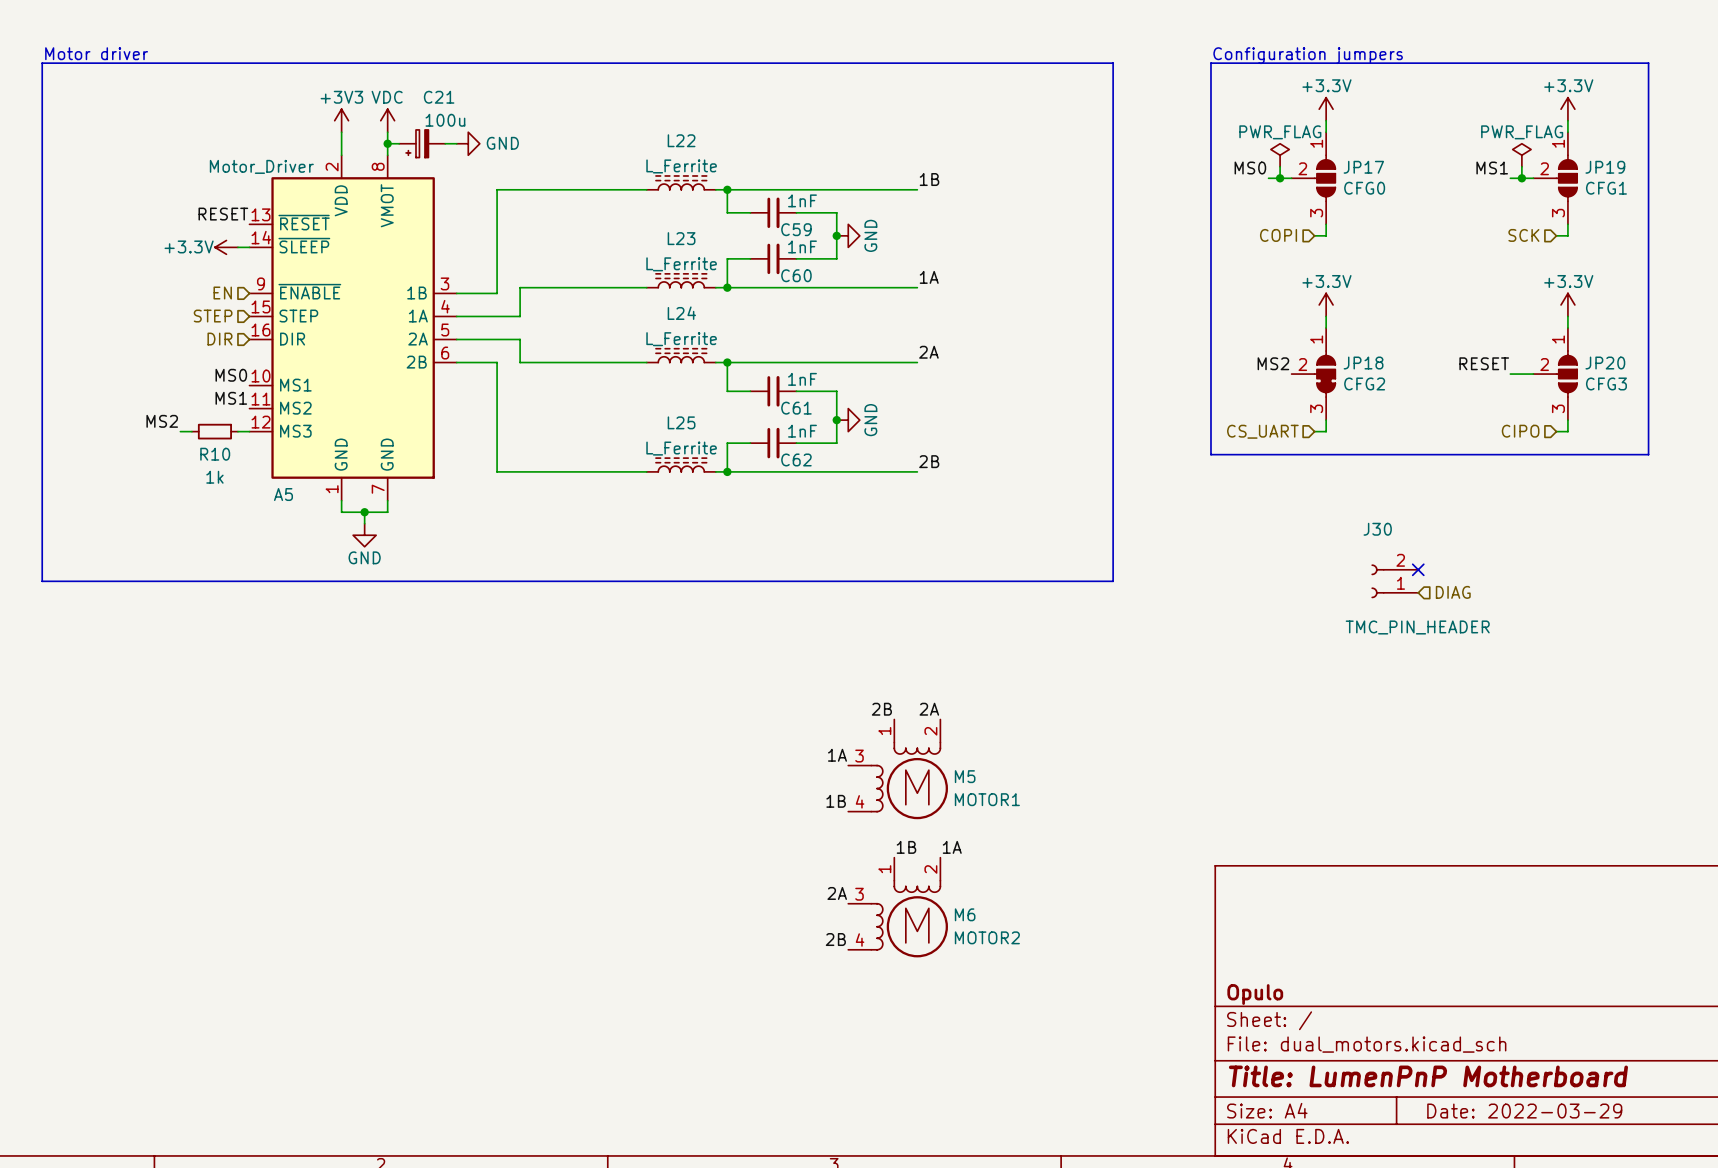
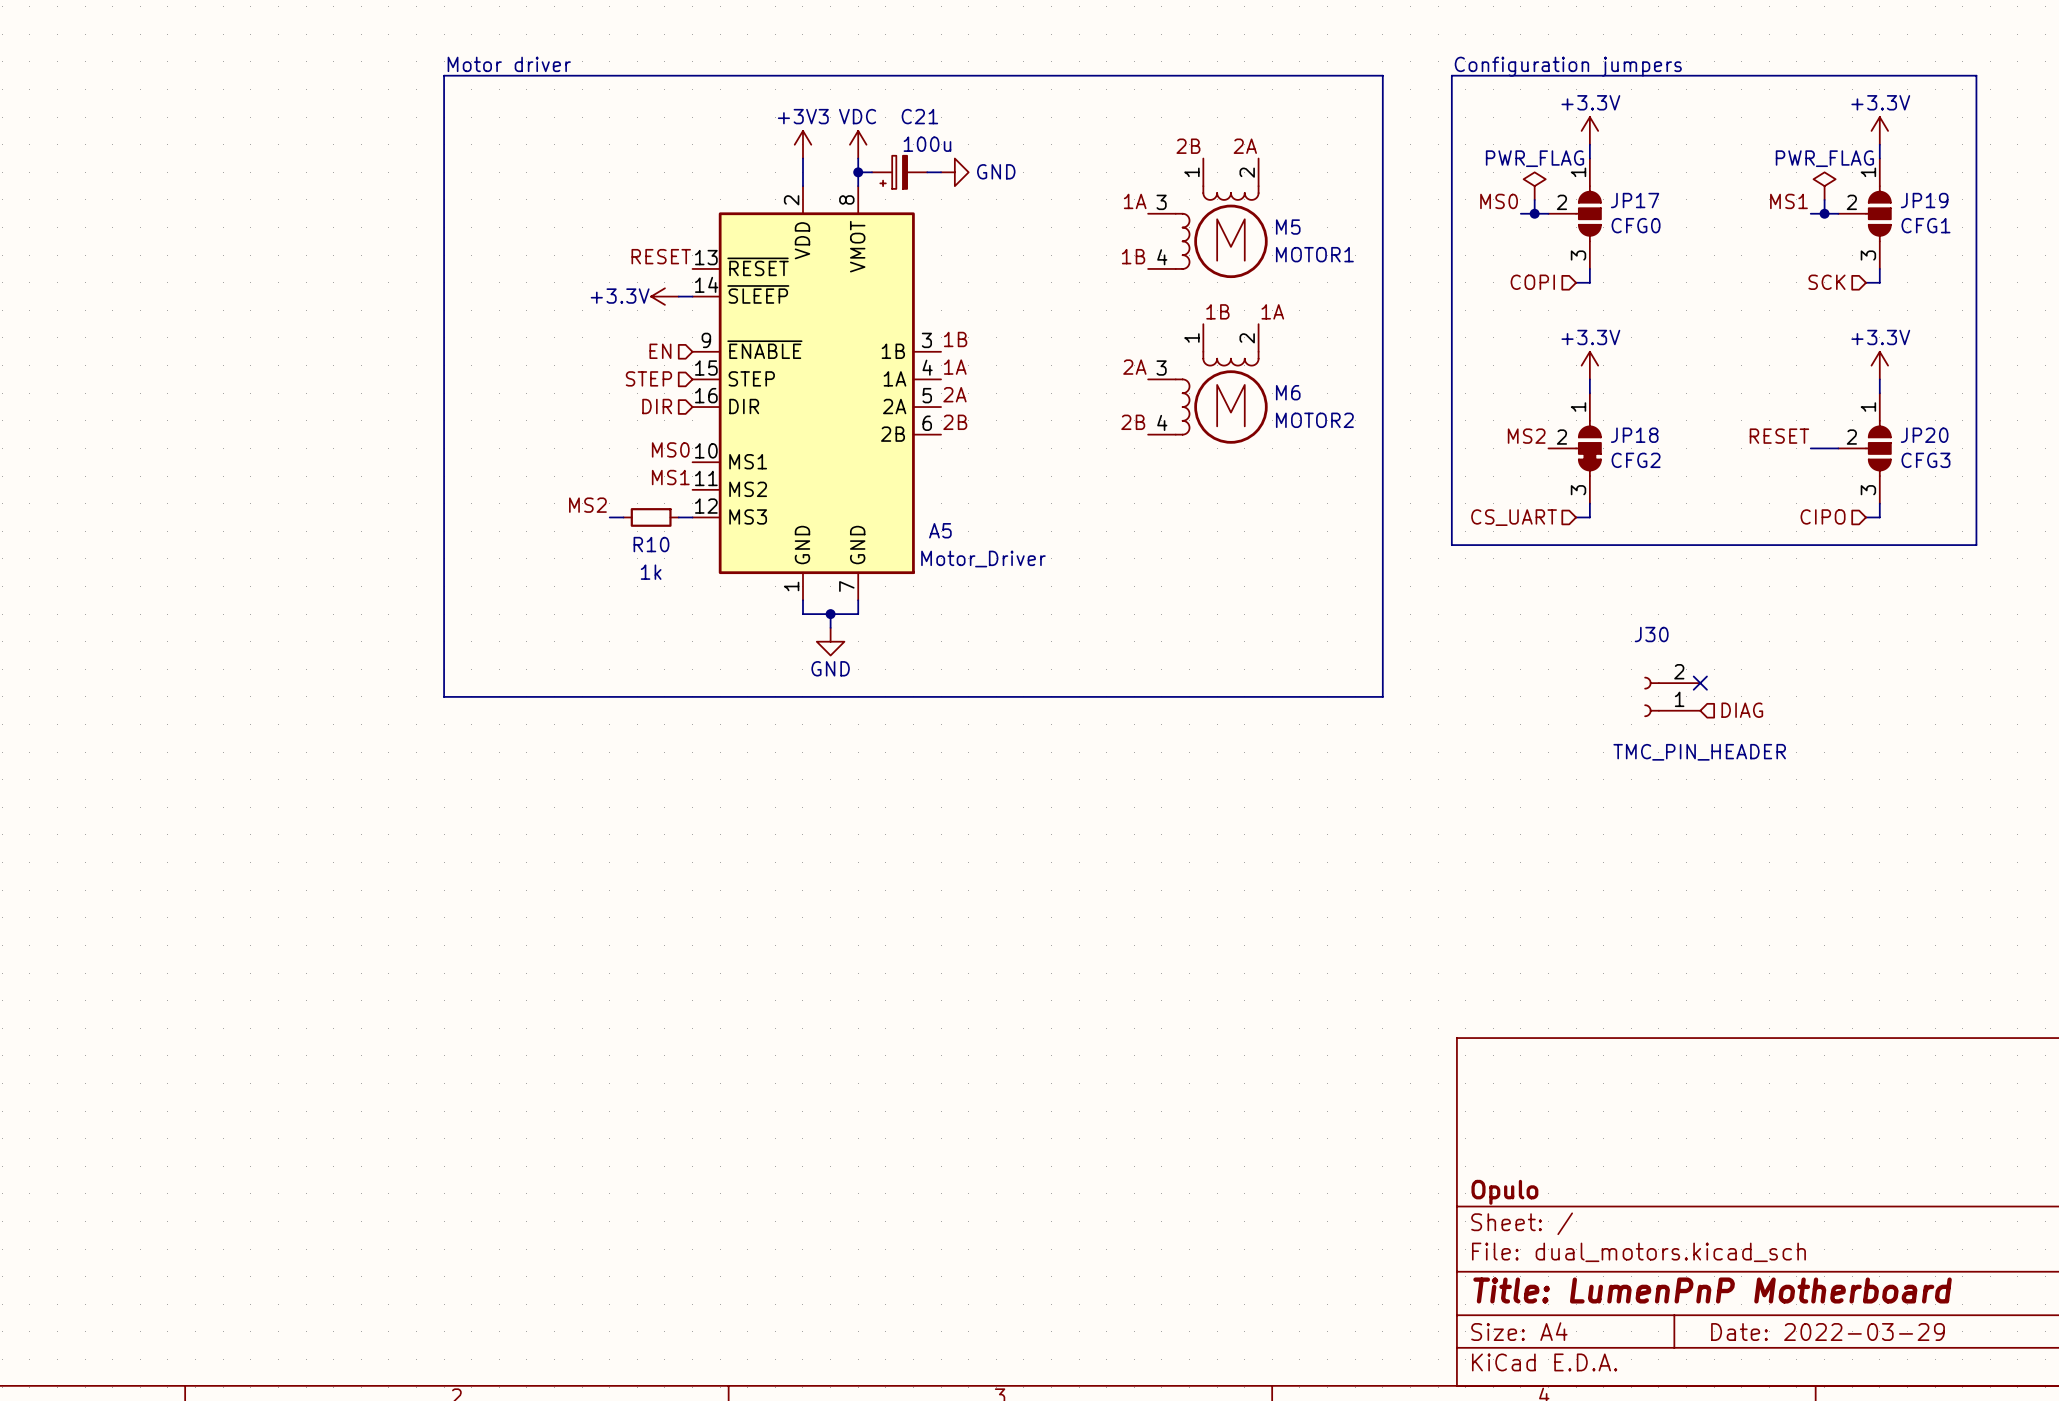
text: Motor driver (96, 53) -> none
text: none -> Motor driver (509, 64)
line: (370, 63) (42, 63) (42, 581) (370, 581) -> (444, 75) (444, 696)
line: (1113, 63) (1113, 581) -> (1334, 75) (1382, 75) (1382, 696) (1334, 696)
power symbol: +3V3 (341, 120) -> none
power symbol: VDC (387, 120) -> none
power symbol: none -> +3V3 (802, 144)
power symbol: none -> VDC (858, 144)
label: none -> 2B (1188, 146)
label: none -> 2A (1245, 146)
wire: (341, 132) (341, 155) -> none
wire: (387, 132) (387, 155) -> none
wire: none -> (802, 158) (802, 186)
wire: none -> (858, 158) (858, 186)
wire: (387, 143) (399, 143) -> none
junction: (387, 143) -> none
C21 position: (422, 143) -> (899, 172)
wire: (445, 143) (456, 143) -> (678, 296) (692, 296)
power symbol: GND (468, 143) -> none
wire: none -> (858, 172) (872, 172)
wire: none -> (927, 172) (941, 172)
A5 value position: Motor_Driver (261, 166) -> Motor_Driver (983, 559)
label: none -> 1A (1135, 201)
label position: 1B (929, 179) -> 1B (1133, 256)
L22: L_Ferrite (681, 182) -> none
wire: (646, 189) (497, 189) (497, 293) (456, 293) -> none
wire: (715, 189) (917, 189) -> none
junction position: (727, 189) -> (858, 172)
C59: 1nF (773, 212) -> none
wire: (796, 212) (836, 212) (836, 258) (796, 258) -> none
label: RESET (223, 214) -> none
label: none -> RESET (661, 256)
junction: (836, 235) -> none
power symbol position: GND (848, 235) -> GND (954, 172)
power symbol text rotation: 0° (870, 235) -> 90° clockwise (996, 171)
power symbol: +3.3V (226, 247) -> none
wire: (237, 247) (249, 247) -> none
power symbol: none -> +3.3V (664, 296)
C60: 1nF (773, 258) -> none
label: none -> 1B (1217, 311)
label: none -> 1A (1272, 311)
label: 1A (929, 277) -> none
L23: L_Ferrite (681, 280) -> none
label: none -> 1B (955, 339)
wire: (646, 287) (520, 287) (520, 316) (456, 316) -> none
wire: (715, 287) (917, 287) -> none
junction: (727, 287) -> none
hierarchical label: EN (222, 293) -> none
hierarchical label: none -> EN (660, 351)
label: none -> 1A (955, 367)
hierarchical label: STEP (213, 316) -> none
hierarchical label: none -> STEP (648, 378)
A5 position: (353, 327) -> (816, 393)
label: none -> 2A (954, 394)
hierarchical label: DIR (219, 339) -> none
wire: (456, 339) (520, 339) (520, 362) (646, 362) -> none
hierarchical label: none -> DIR (657, 406)
label: none -> 2B (955, 422)
label position: 2A (928, 352) -> 2A (1134, 367)
label: none -> 2B (1133, 422)
L24: L_Ferrite (681, 355) -> none
wire: (456, 362) (497, 362) (497, 471) (646, 471) -> none
wire: (715, 362) (917, 362) -> none
junction: (727, 362) -> none
label: MS0 (231, 375) -> none
label: none -> MS0 (670, 449)
C61: 1nF (773, 391) -> none
wire: (796, 391) (836, 391) (836, 443) (796, 443) -> none
label: MS1 (231, 398) -> none
label: none -> MS1 (670, 477)
junction: (836, 420) -> none
power symbol: GND (848, 420) -> none
label: MS2 (162, 421) -> none
label: none -> MS2 (587, 505)
wire: (180, 431) (191, 431) -> none
R10 position: (214, 431) -> (651, 517)
wire: (237, 431) (249, 431) -> none
wire: none -> (609, 517) (623, 517)
wire: none -> (678, 517) (692, 517)
C62: 1nF (773, 443) -> none
label: 2B (929, 461) -> none
L25: L_Ferrite (681, 465) -> none
wire: (715, 471) (917, 471) -> none
junction position: (727, 471) -> (830, 614)
A5 name position: A5 (283, 494) -> A5 (940, 530)
wire: (341, 500) (341, 512) (387, 512) (387, 500) -> none
wire: none -> (802, 600) (802, 614) (858, 614) (858, 600)
wire: (364, 512) (364, 523) -> none
junction: (364, 512) -> none
wire: none -> (830, 614) (830, 627)
power symbol: GND (364, 535) -> none
power symbol: none -> GND (830, 641)
label: 2B (881, 709) -> none
label: 2A (929, 709) -> none
label: 1A (837, 755) -> none
M5 position: (898, 769) -> (1207, 218)
label: 1B (836, 801) -> none
label: 1B (906, 847) -> none
label: 1A (952, 847) -> none
label: 2A (837, 893) -> none
M6 position: (898, 907) -> (1207, 383)
label: 2B (835, 939) -> none

